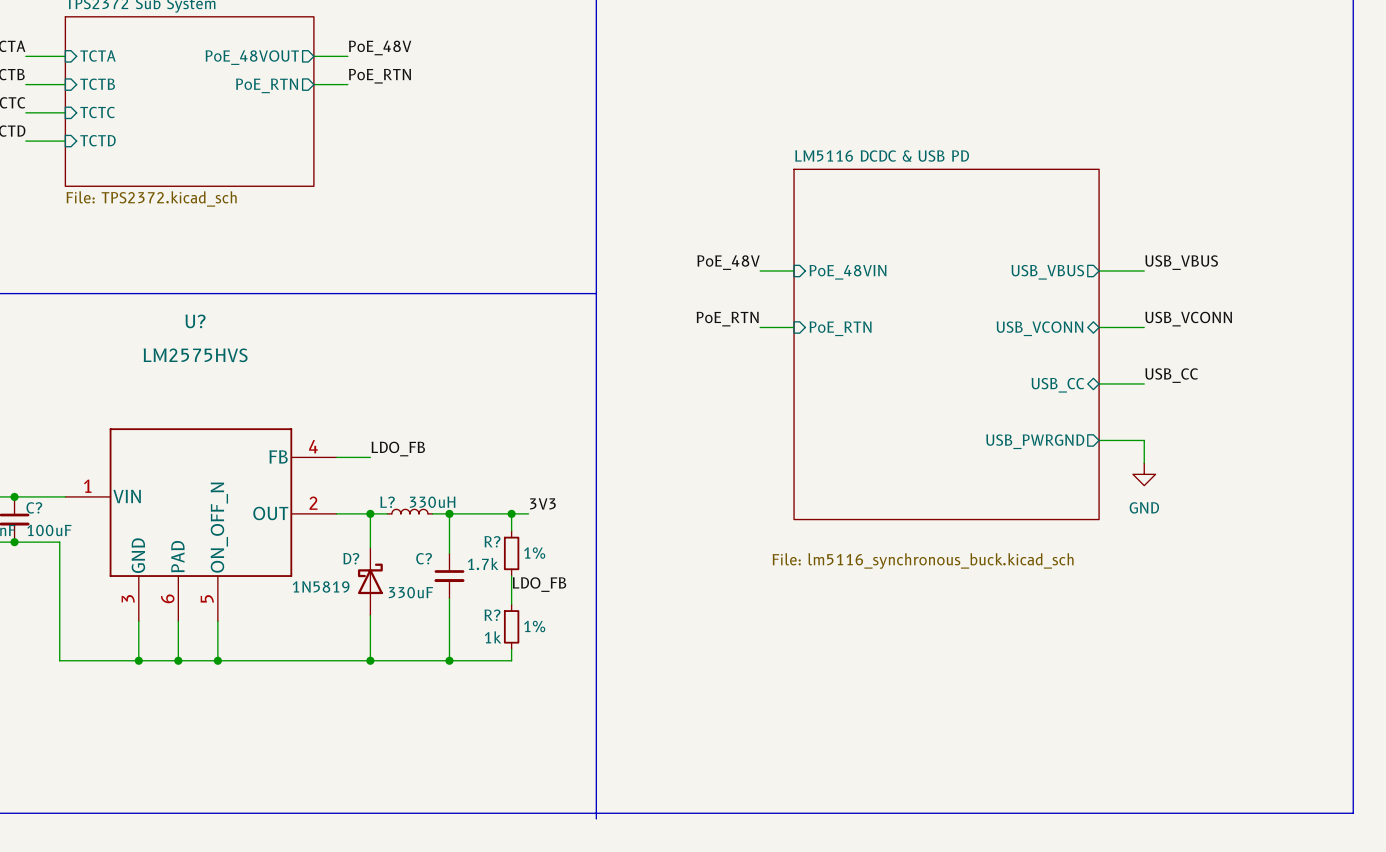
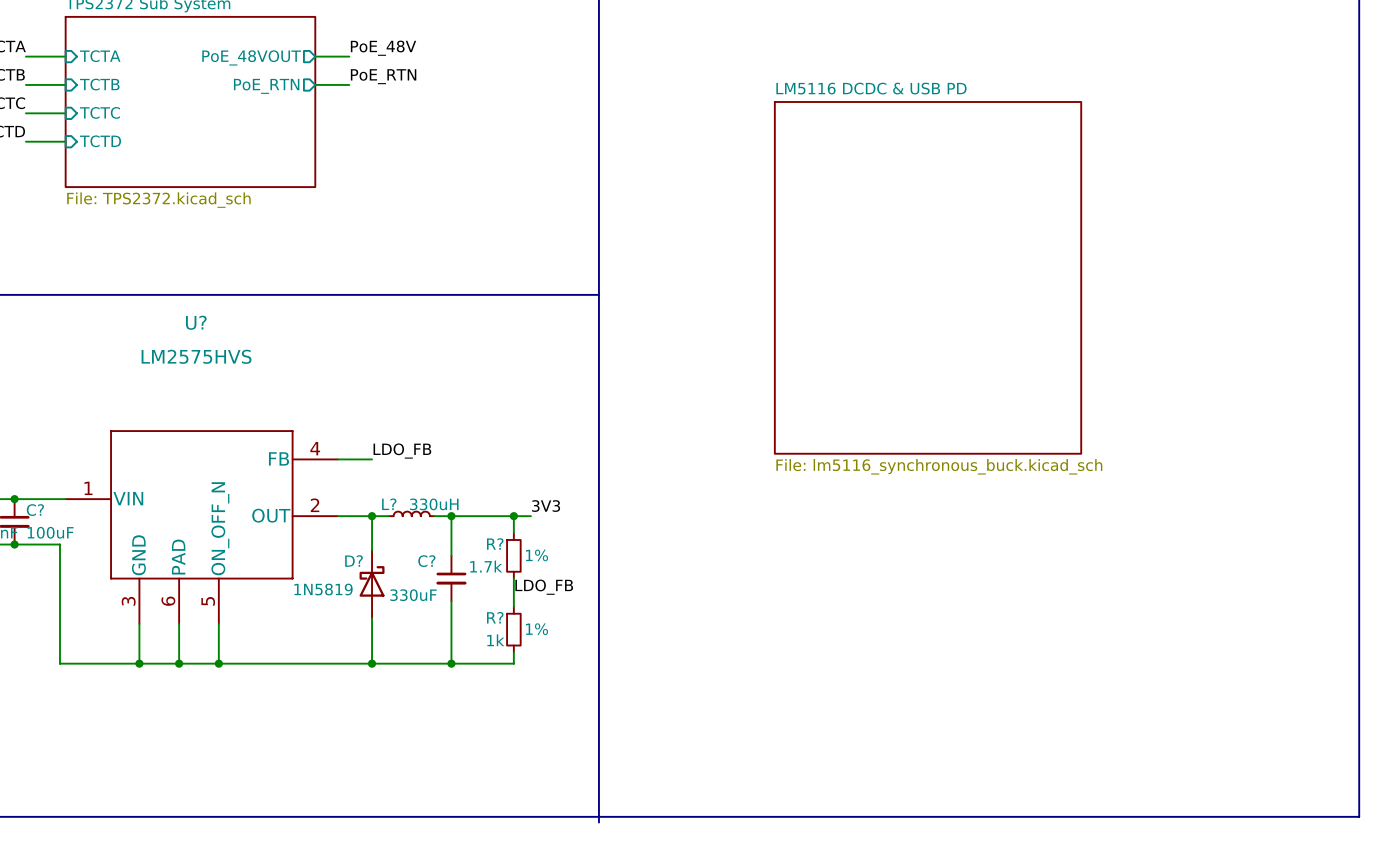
label: PoE_48V (728, 262) -> none
label: USB_VBUS (1181, 262) -> none
wire: (760, 271) (794, 271) -> none
wire: (1099, 271) (1144, 271) -> none
sheet pin: PoE_48VIN (847, 272) -> none
sheet pin: USB_VBUS (1047, 272) -> none
label: PoE_RTN (727, 319) -> none
label: USB_VCONN (1188, 319) -> none
wire: (760, 327) (794, 327) -> none
wire: (1099, 327) (1144, 327) -> none
sheet pin: PoE_RTN (840, 328) -> none
sheet pin: USB_VCONN (1039, 328) -> none
sheet LM5116 DCDC & USB PD position: (946, 344) -> (928, 277)
label: USB_CC (1171, 375) -> none
wire: (1099, 383) (1144, 383) -> none
sheet pin: USB_CC (1057, 385) -> none
wire: (1099, 440) (1144, 440) (1144, 463) -> none
sheet pin: USB_PWRGND (1035, 441) -> none
power symbol: GND (1144, 474) -> none
sheet LM5116 DCDC & USB PD value position: File: lm5116_synchronous_buck.kicad_sch (923, 561) -> File: lm5116_synchronous_buck.kicad_sch (939, 466)

